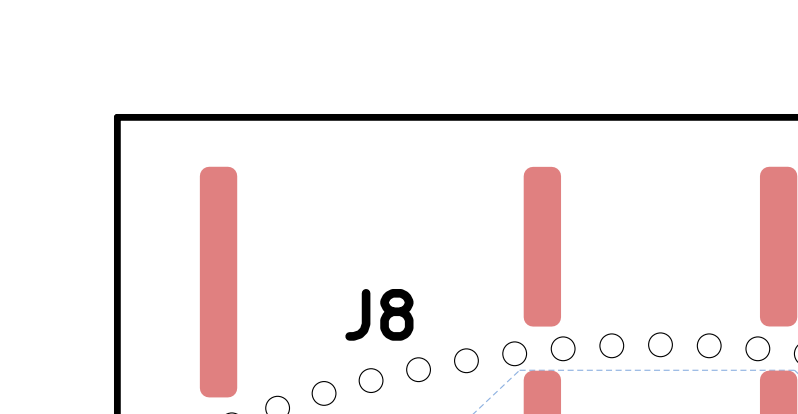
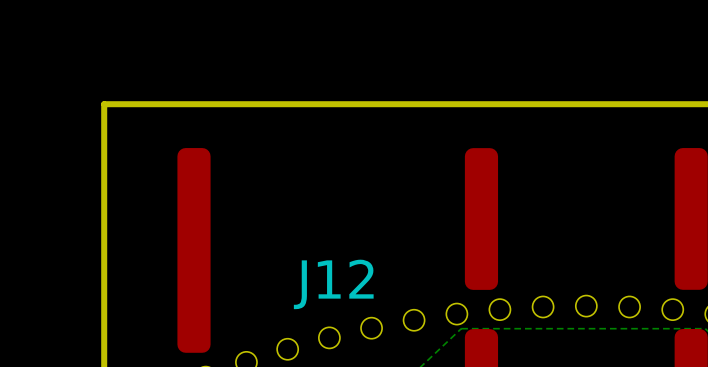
J8 name: J8 (379, 314) -> J12 (333, 284)

